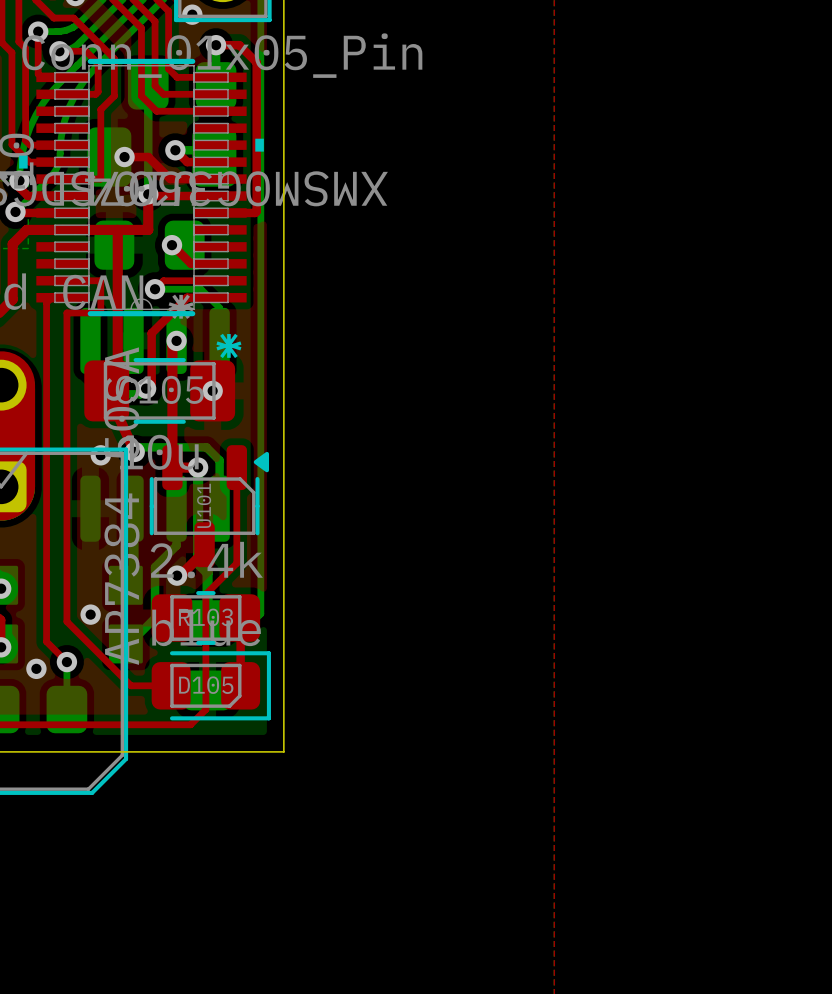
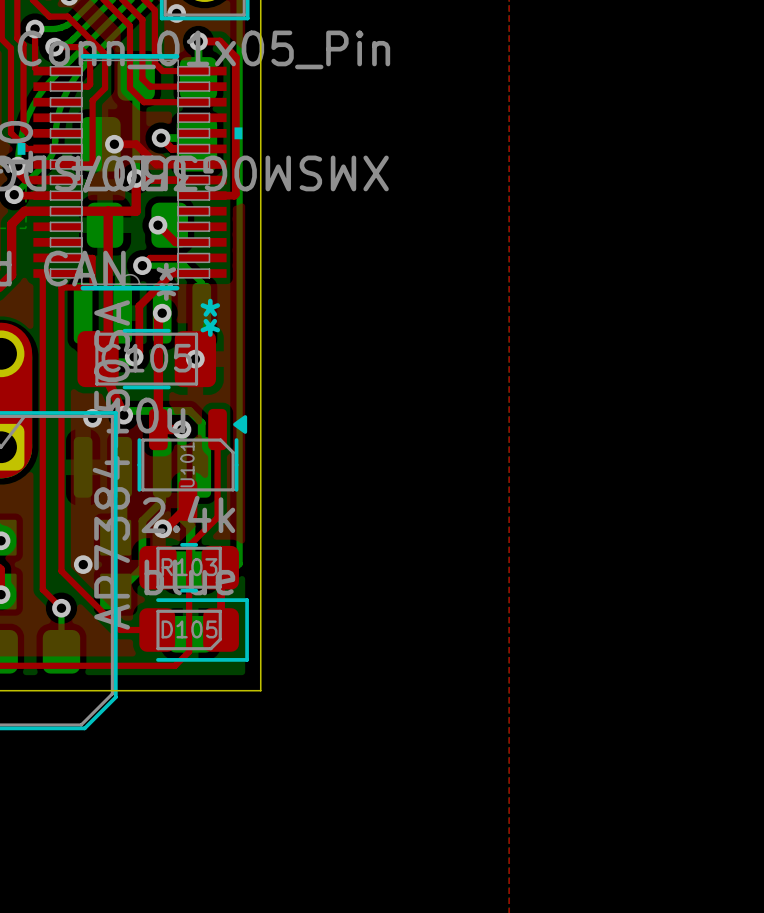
via: (36, 668) -> none

